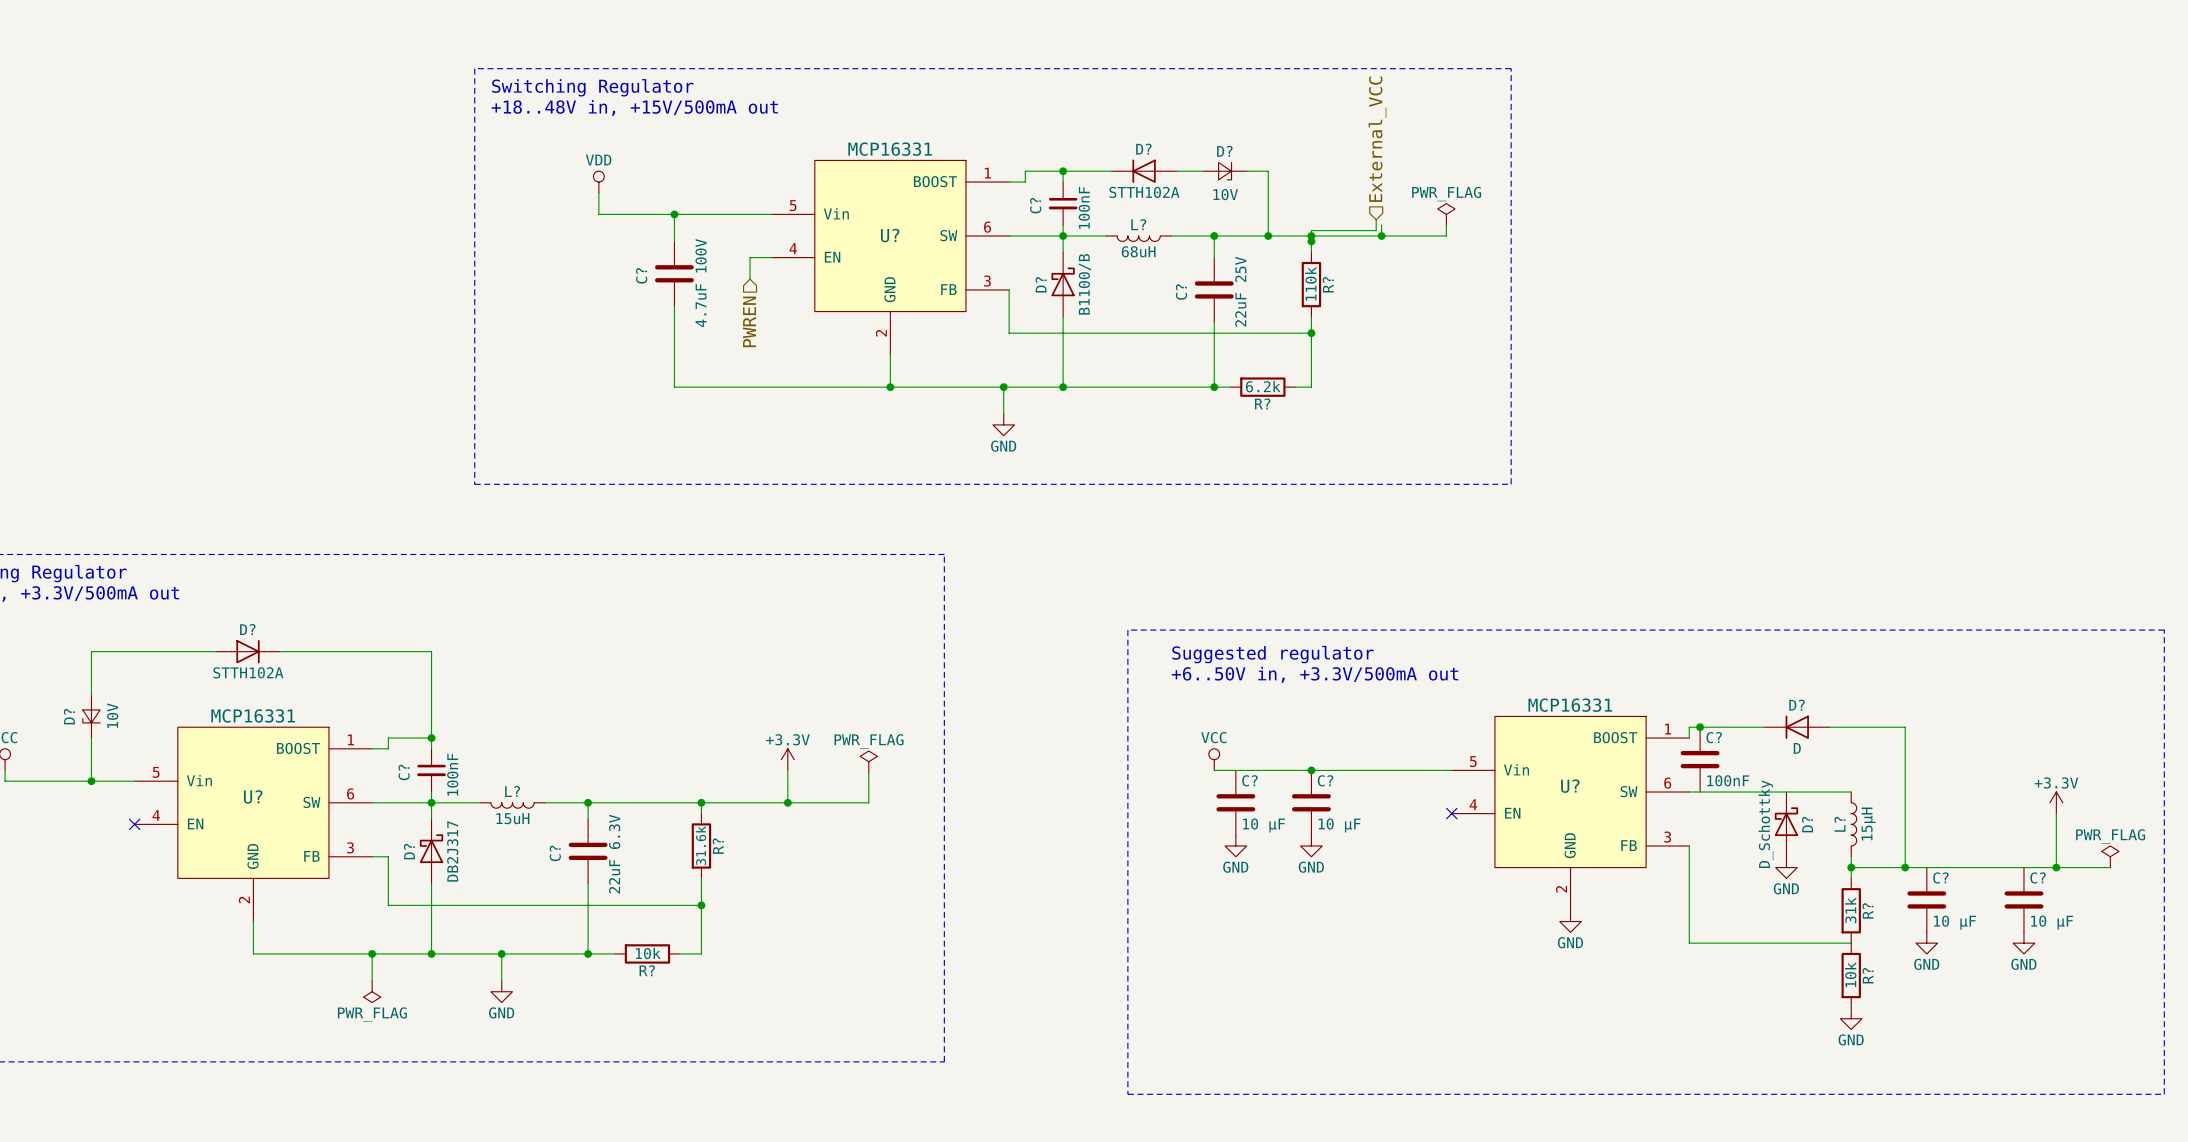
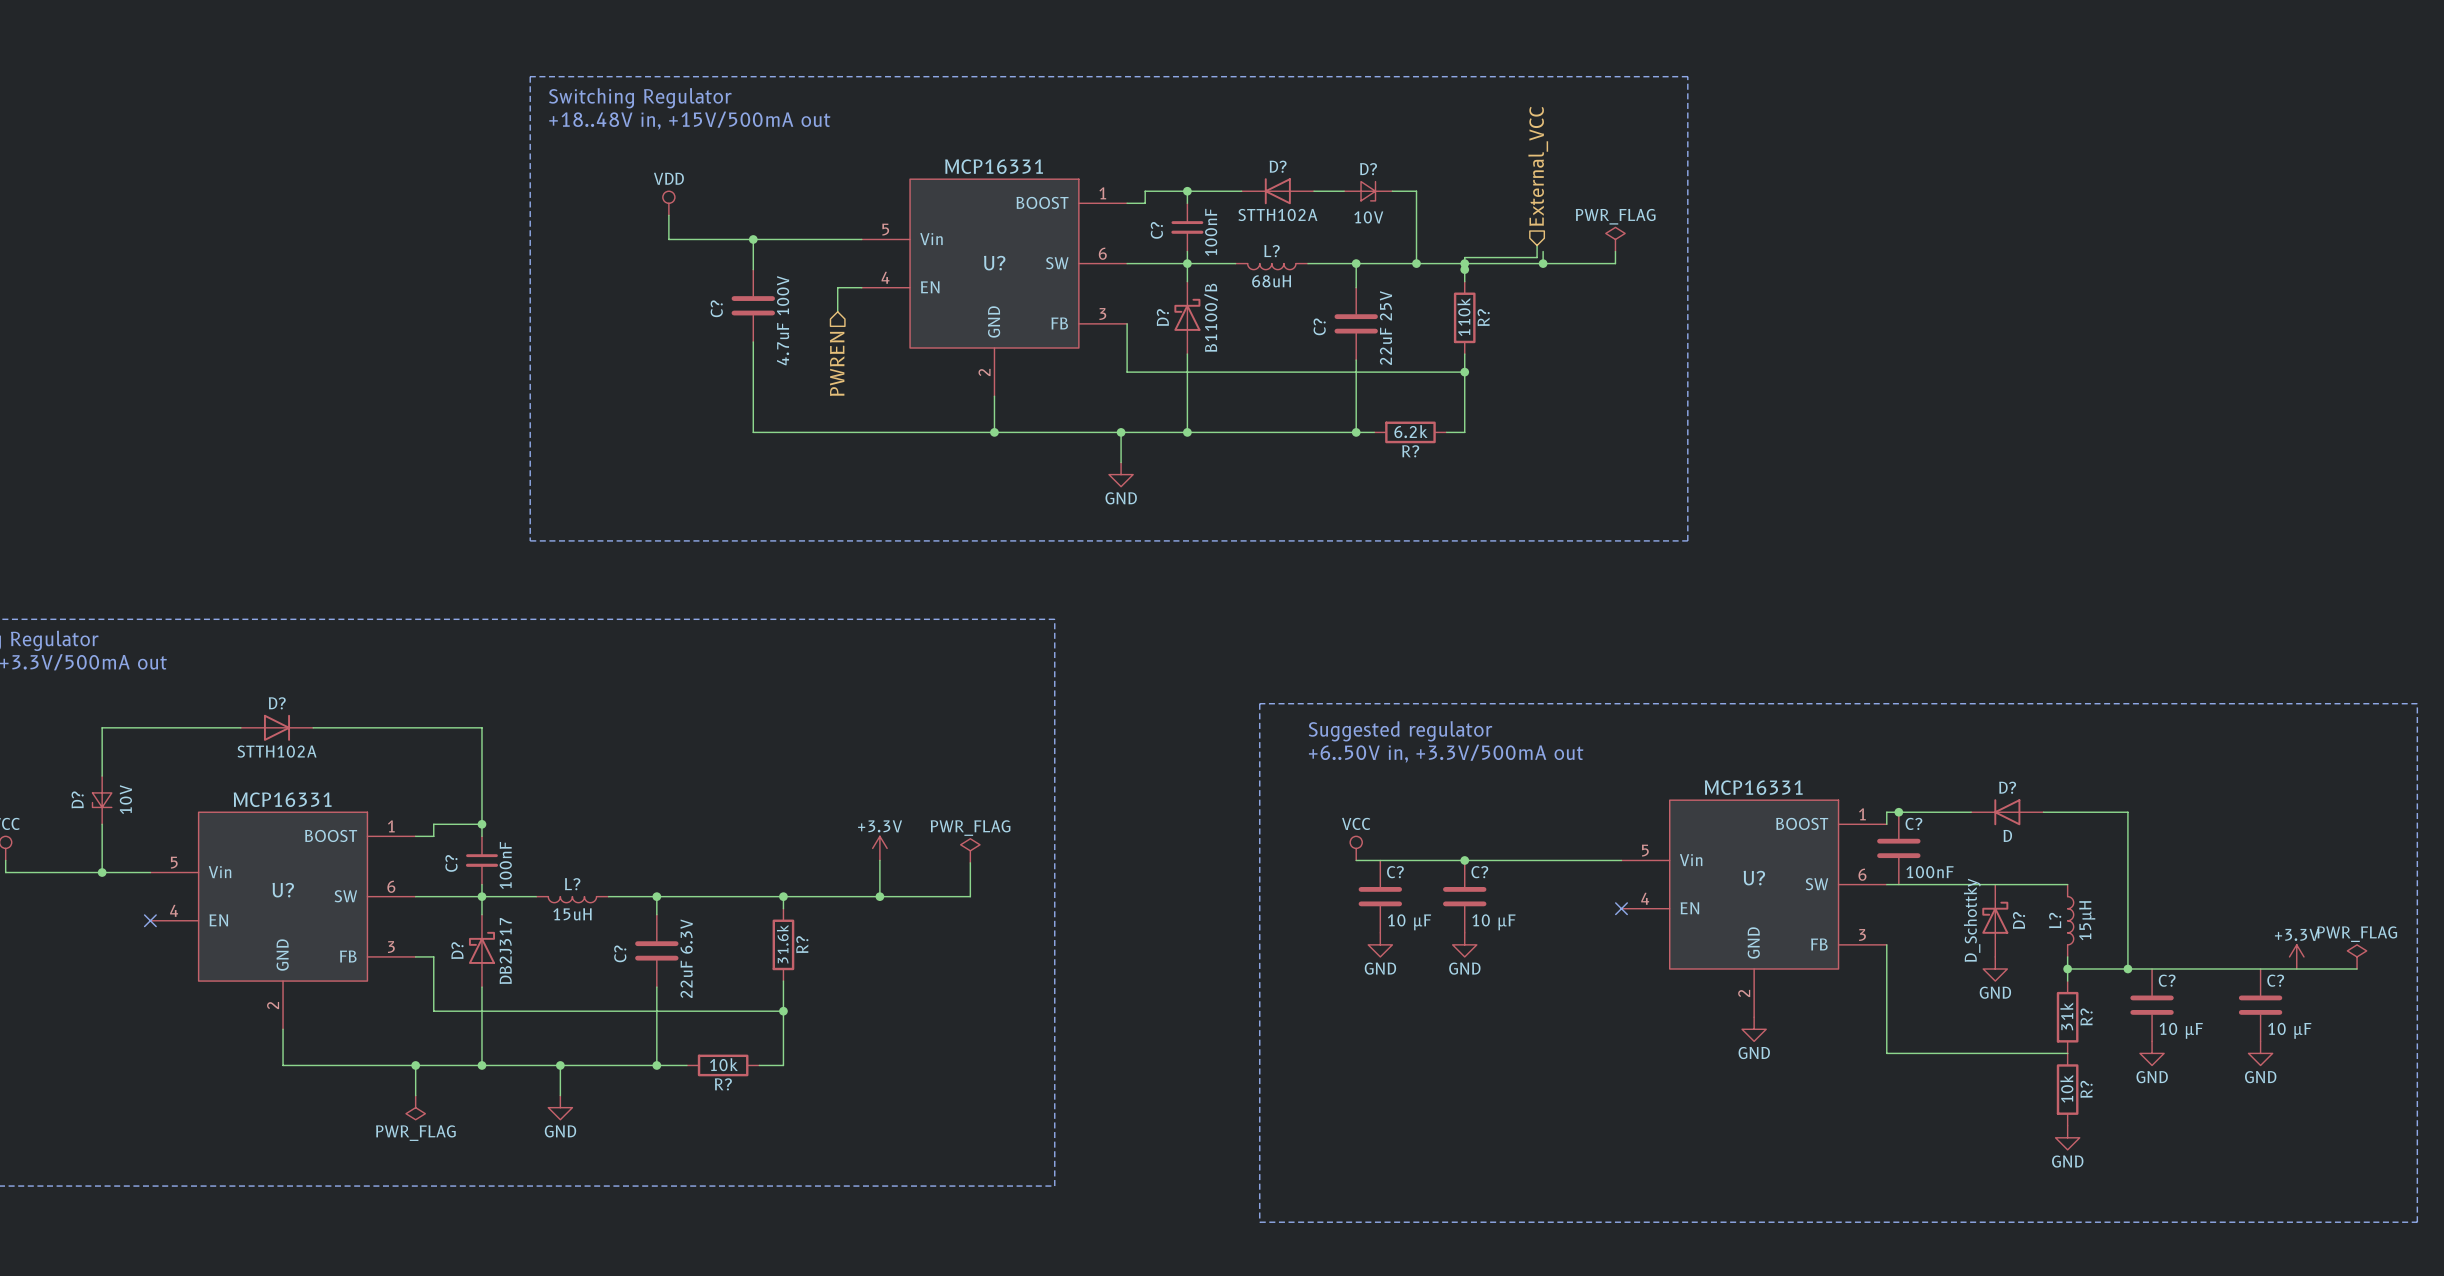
power symbol position: +3.3V (2056, 802) -> +3.3V (2296, 956)
wire: (2056, 813) (2056, 867) -> none
junction: (2056, 867) -> none

